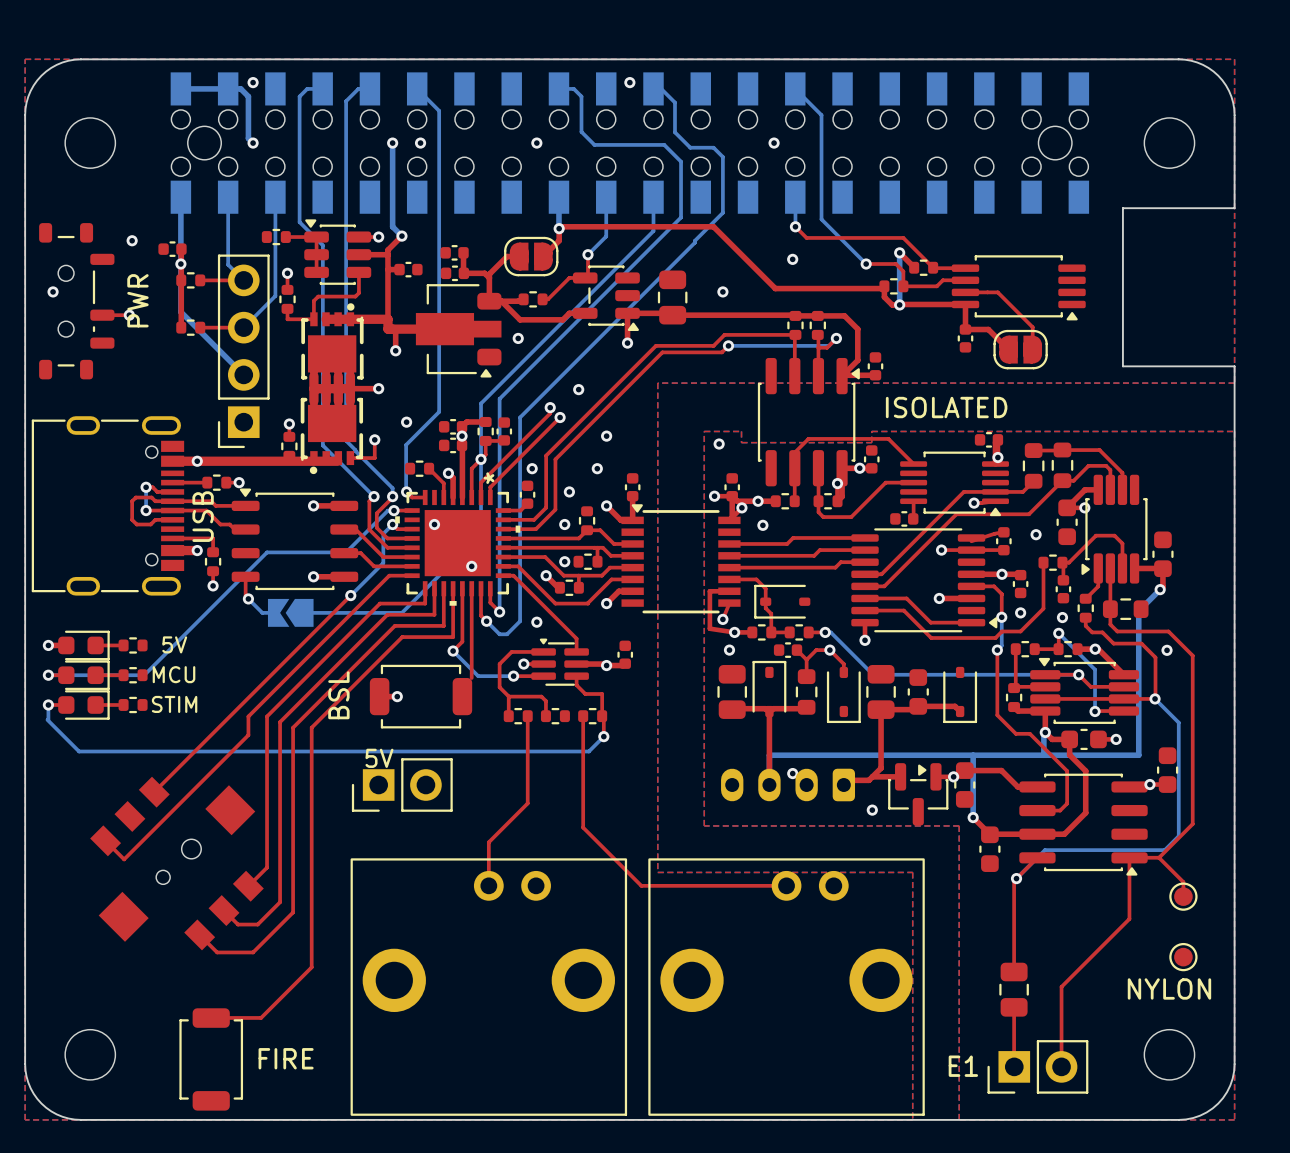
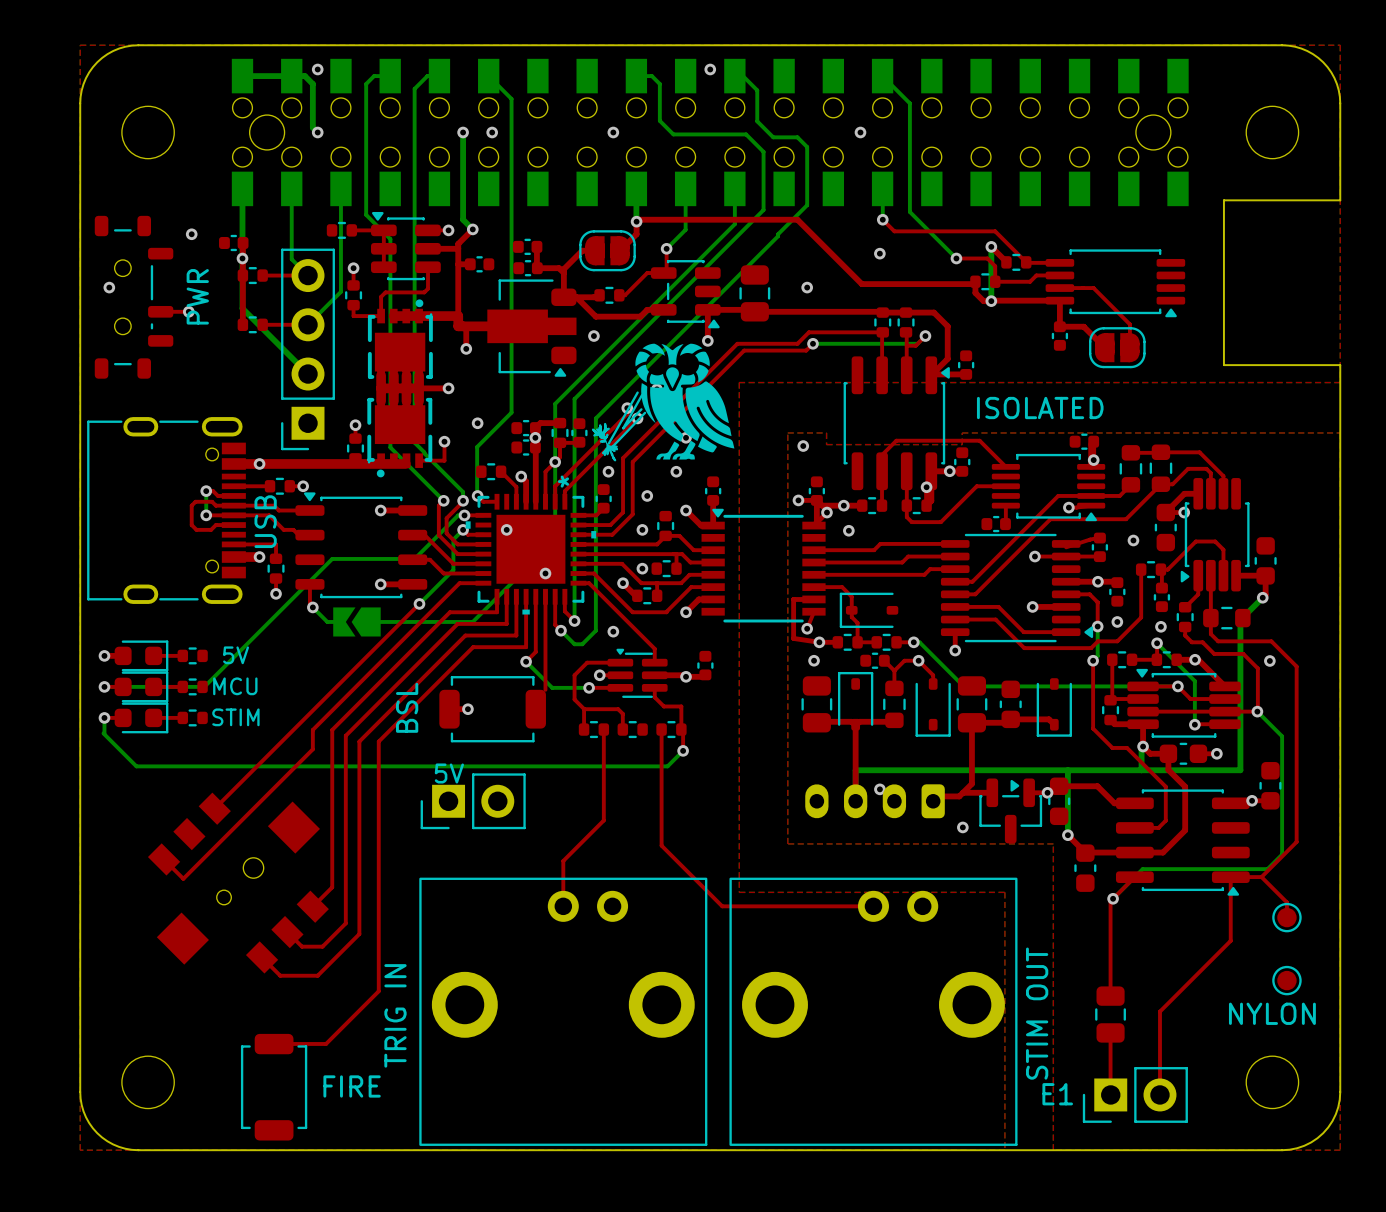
drawing: none -> [591, 343, 735, 462]
text: none -> STIM OUT (1037, 1013)
text: none -> TRIG IN (395, 1015)

